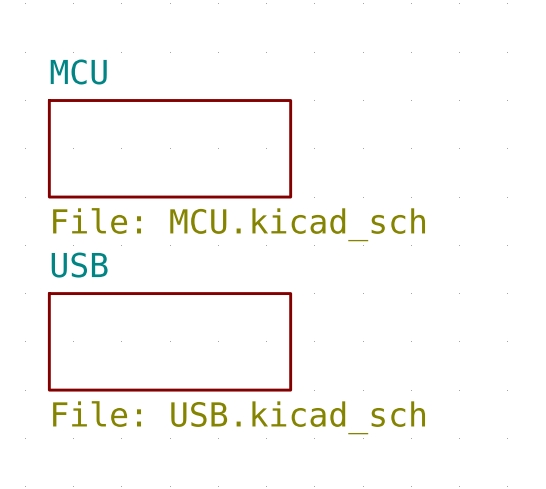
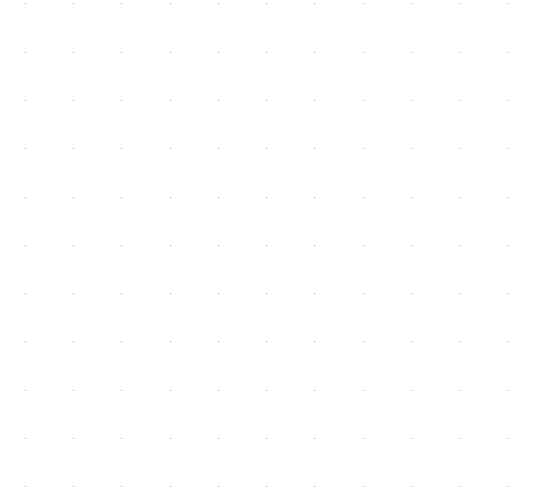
sheet MCU: File: MCU.kicad_sch (170, 148) -> none
sheet USB: File: USB.kicad_sch (170, 341) -> none

